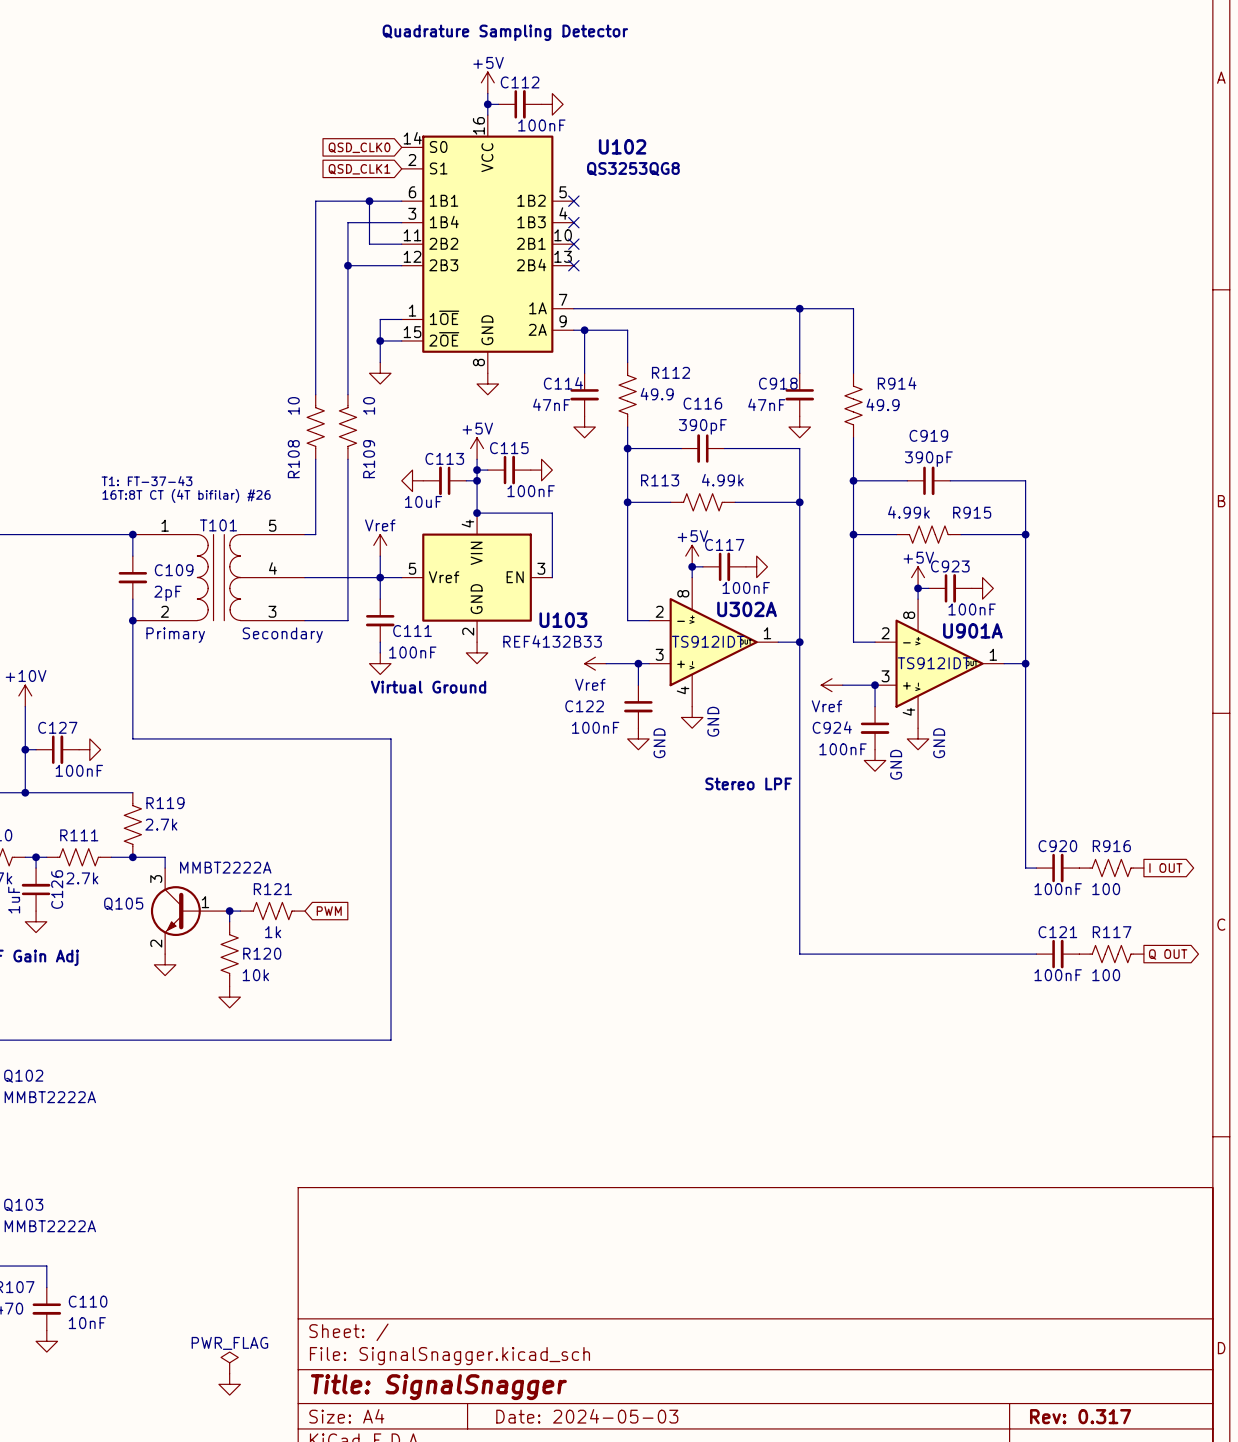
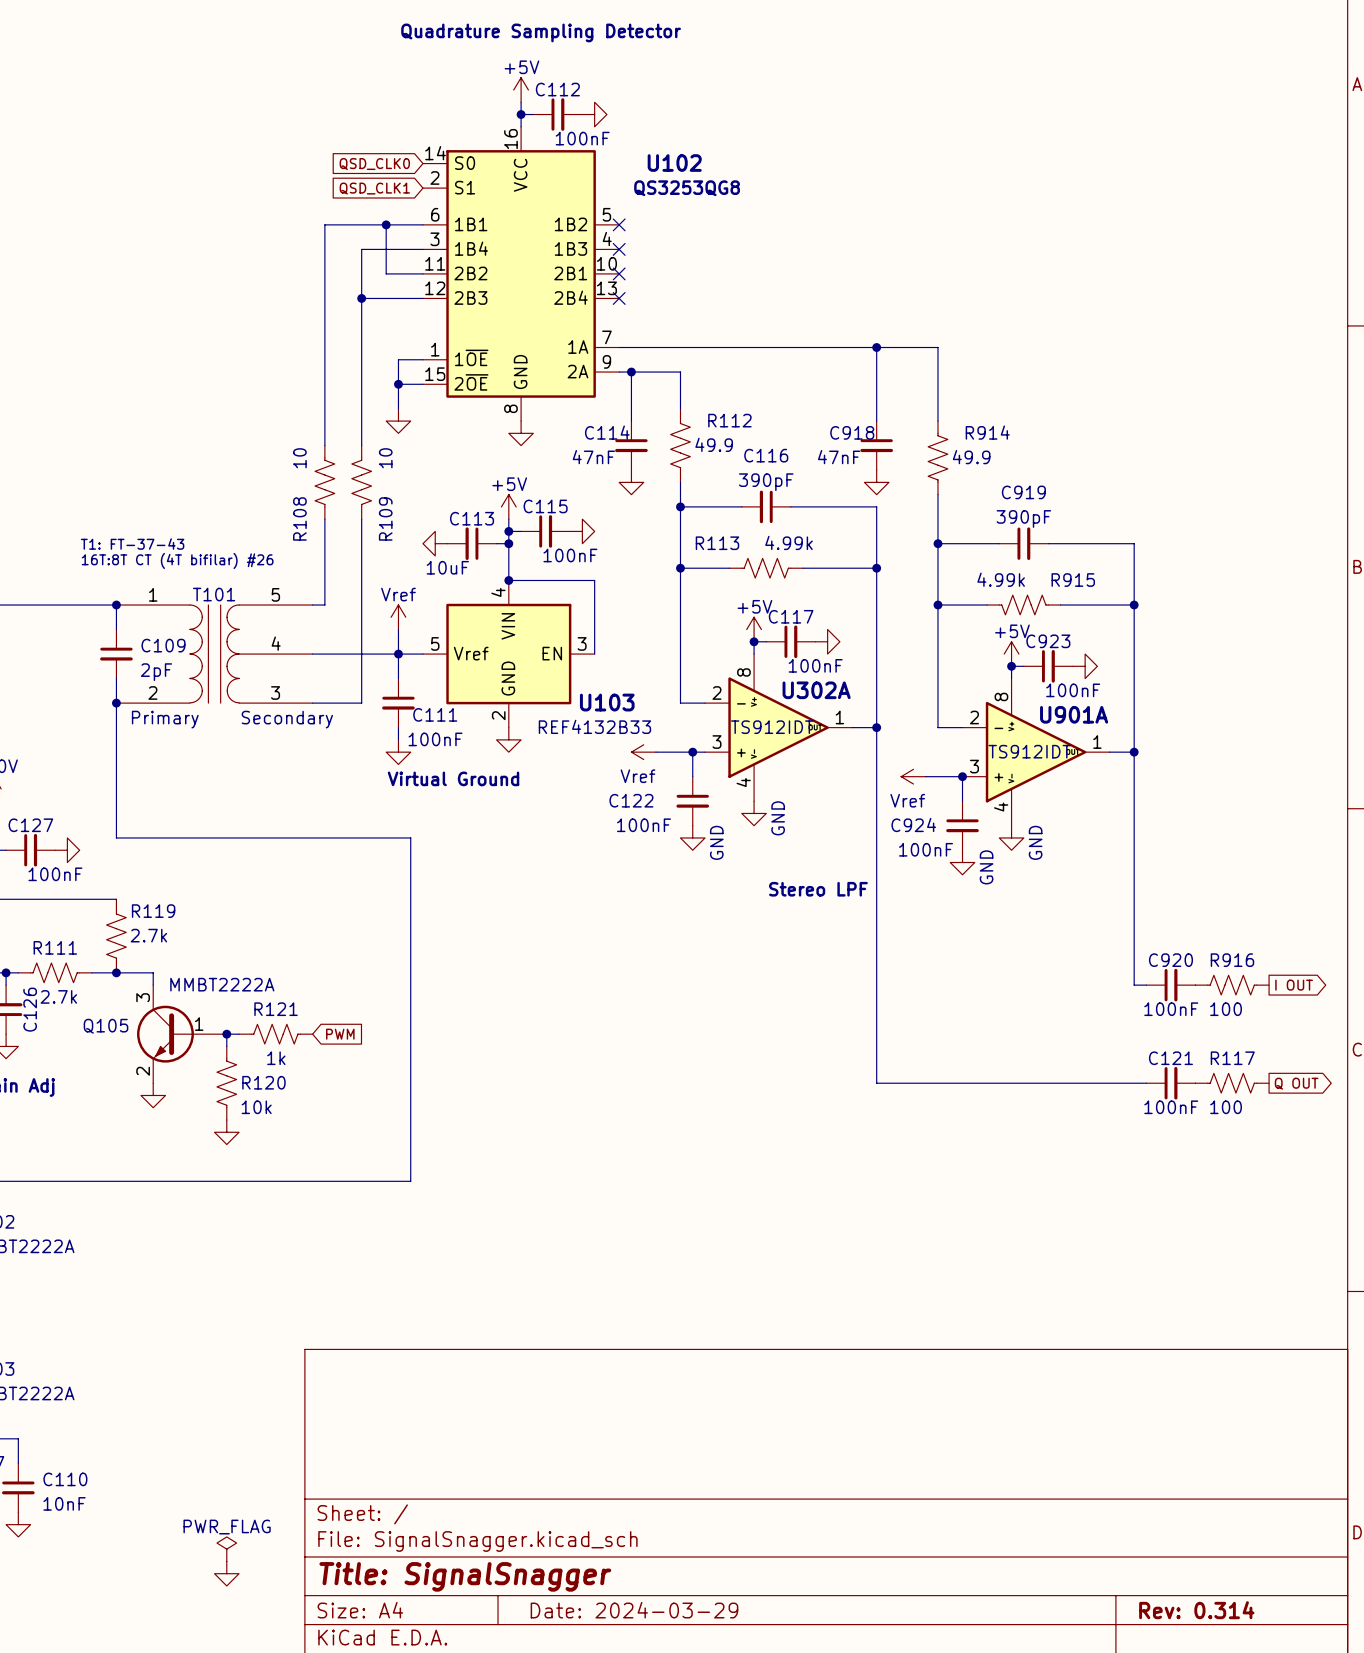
title block: Date: 2024-05-03 (587, 1416) -> Date: 2024-03-29 (634, 1610)
title block: Rev: 0.317 (1080, 1416) -> Rev: 0.314 (1196, 1610)

